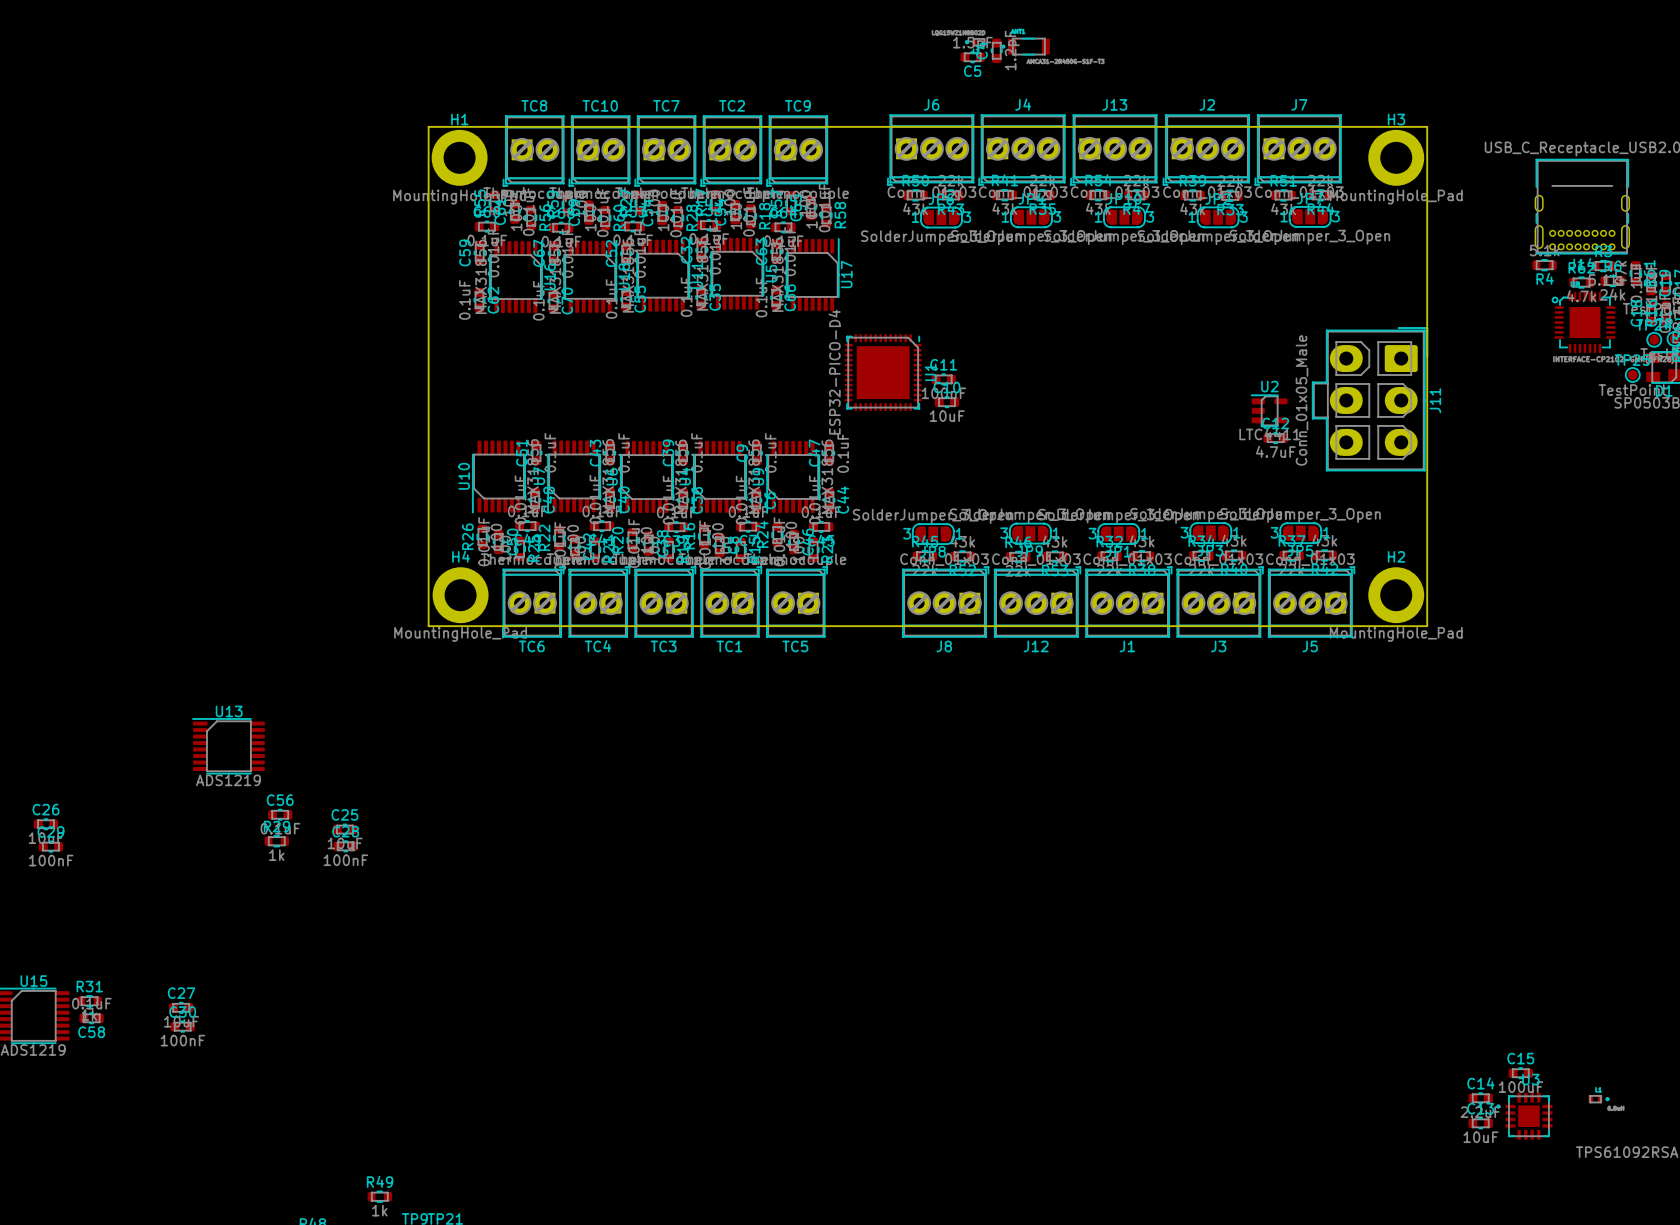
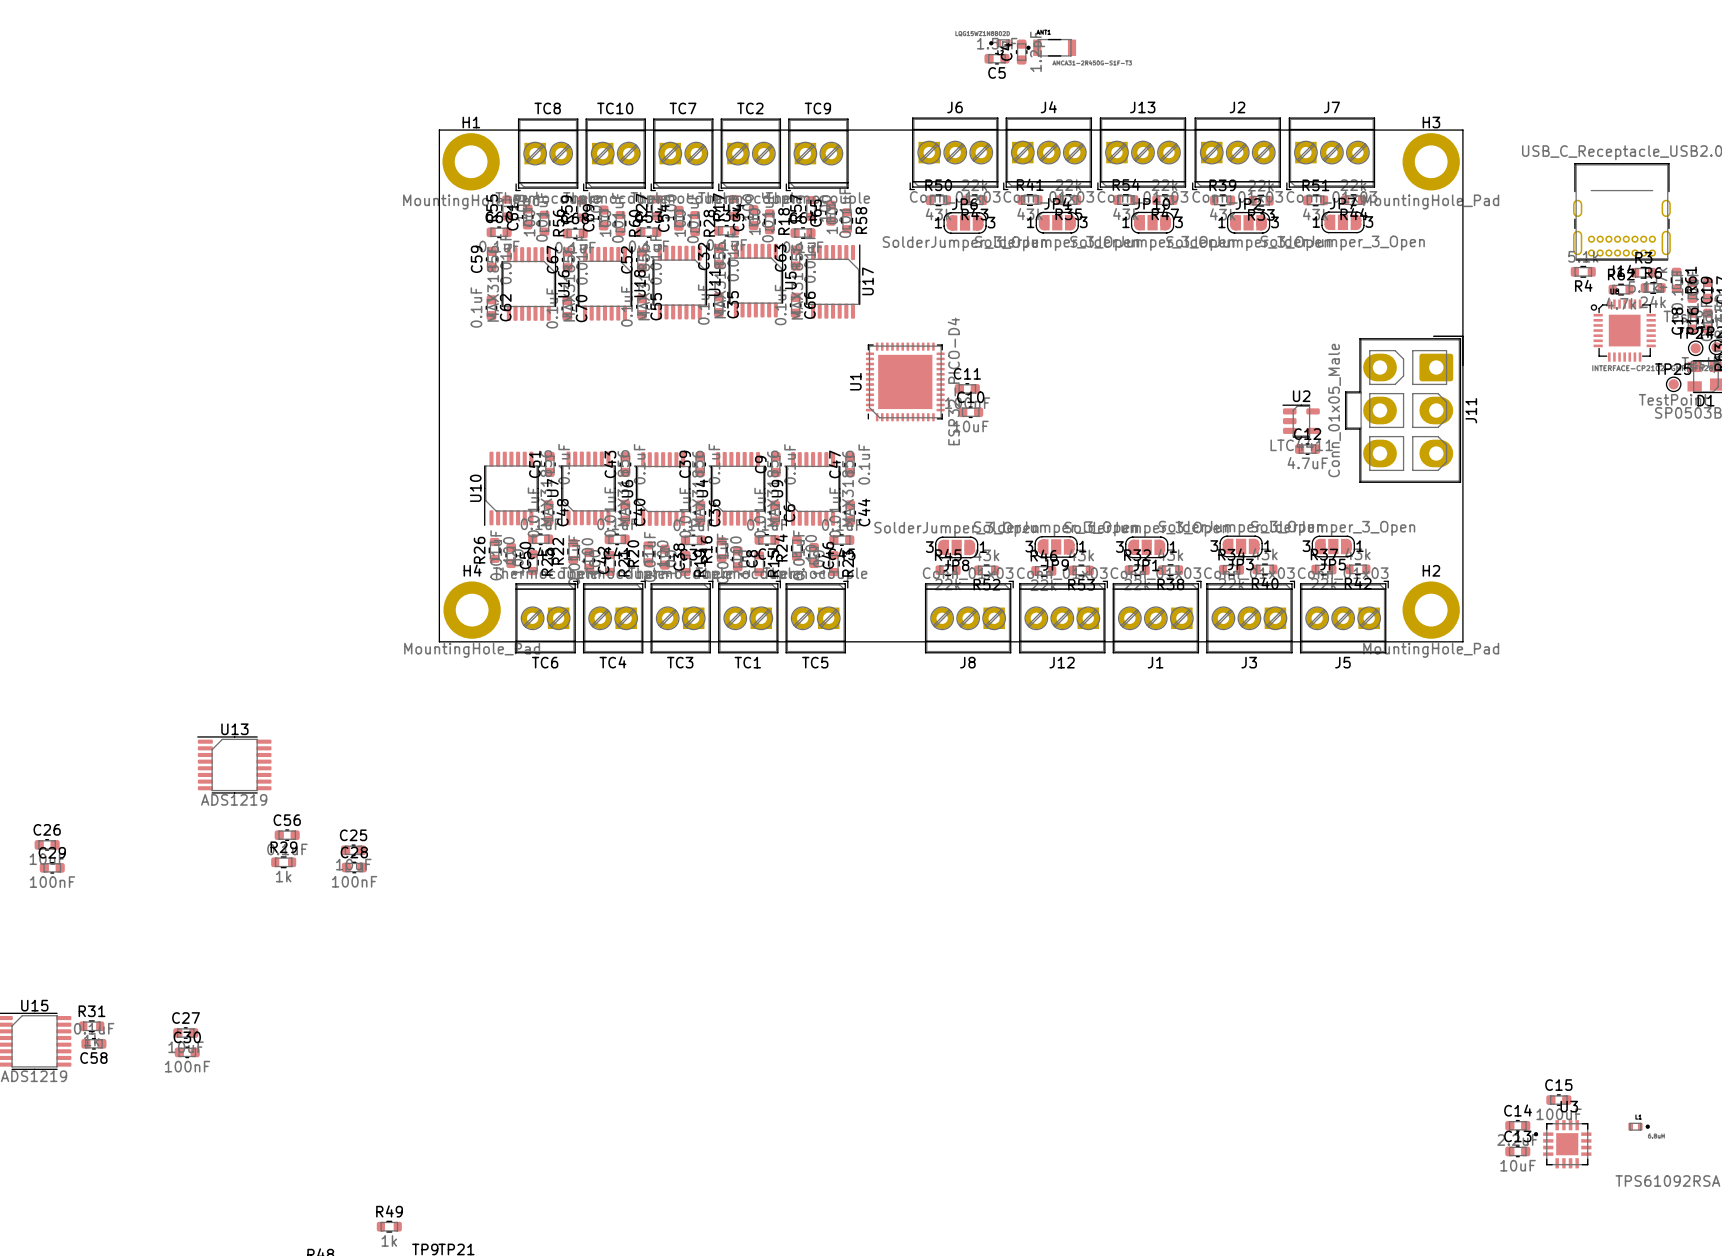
U1 rotation: 0° (883, 372) -> 180° (905, 381)

